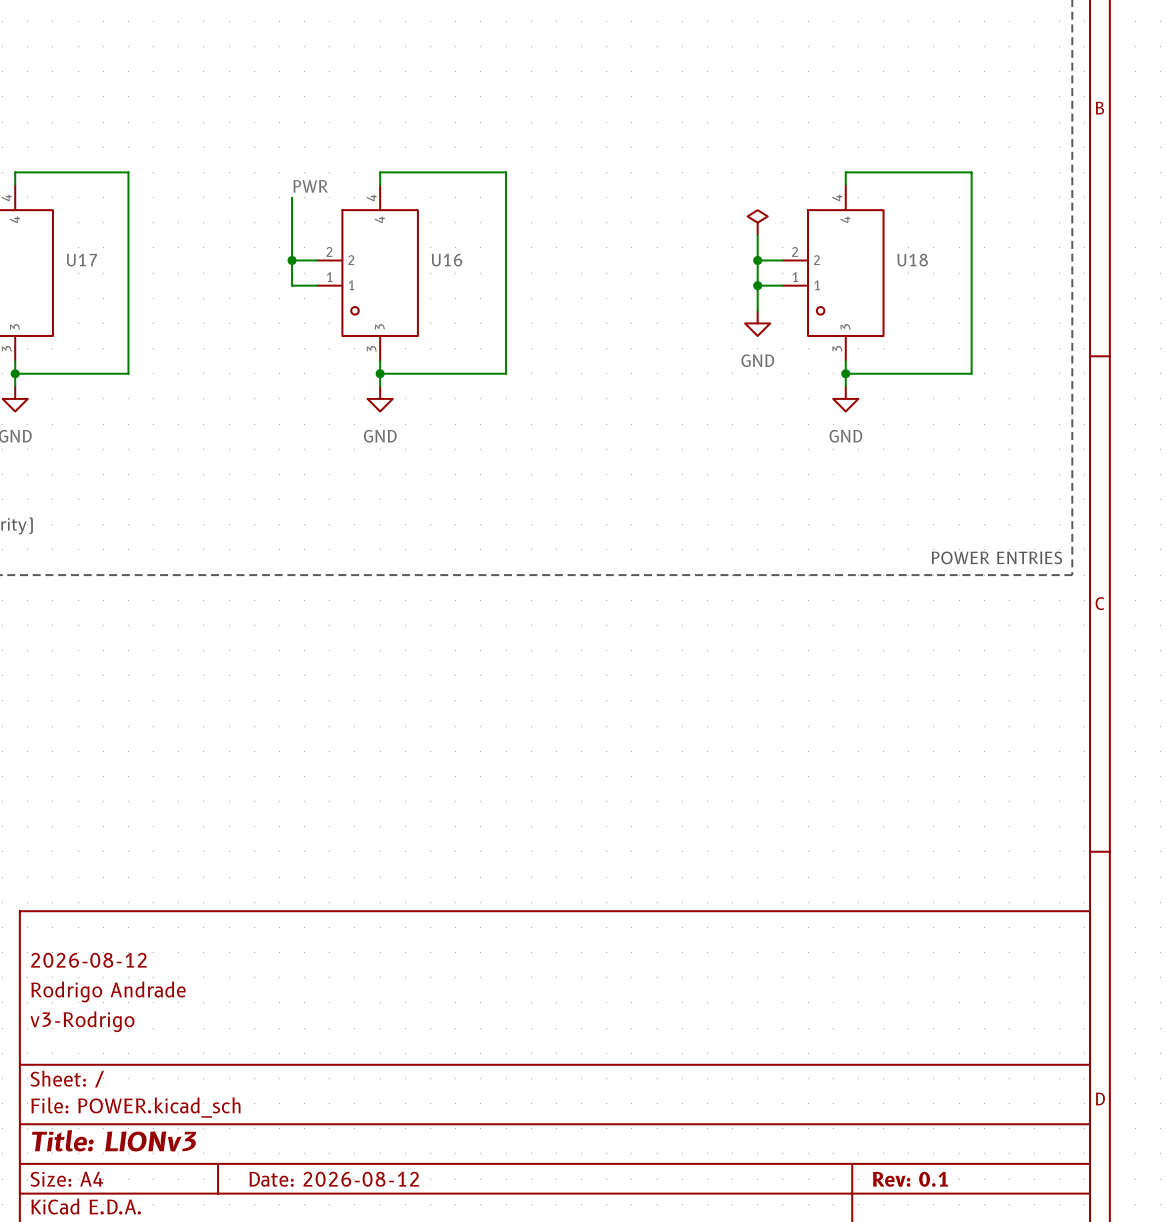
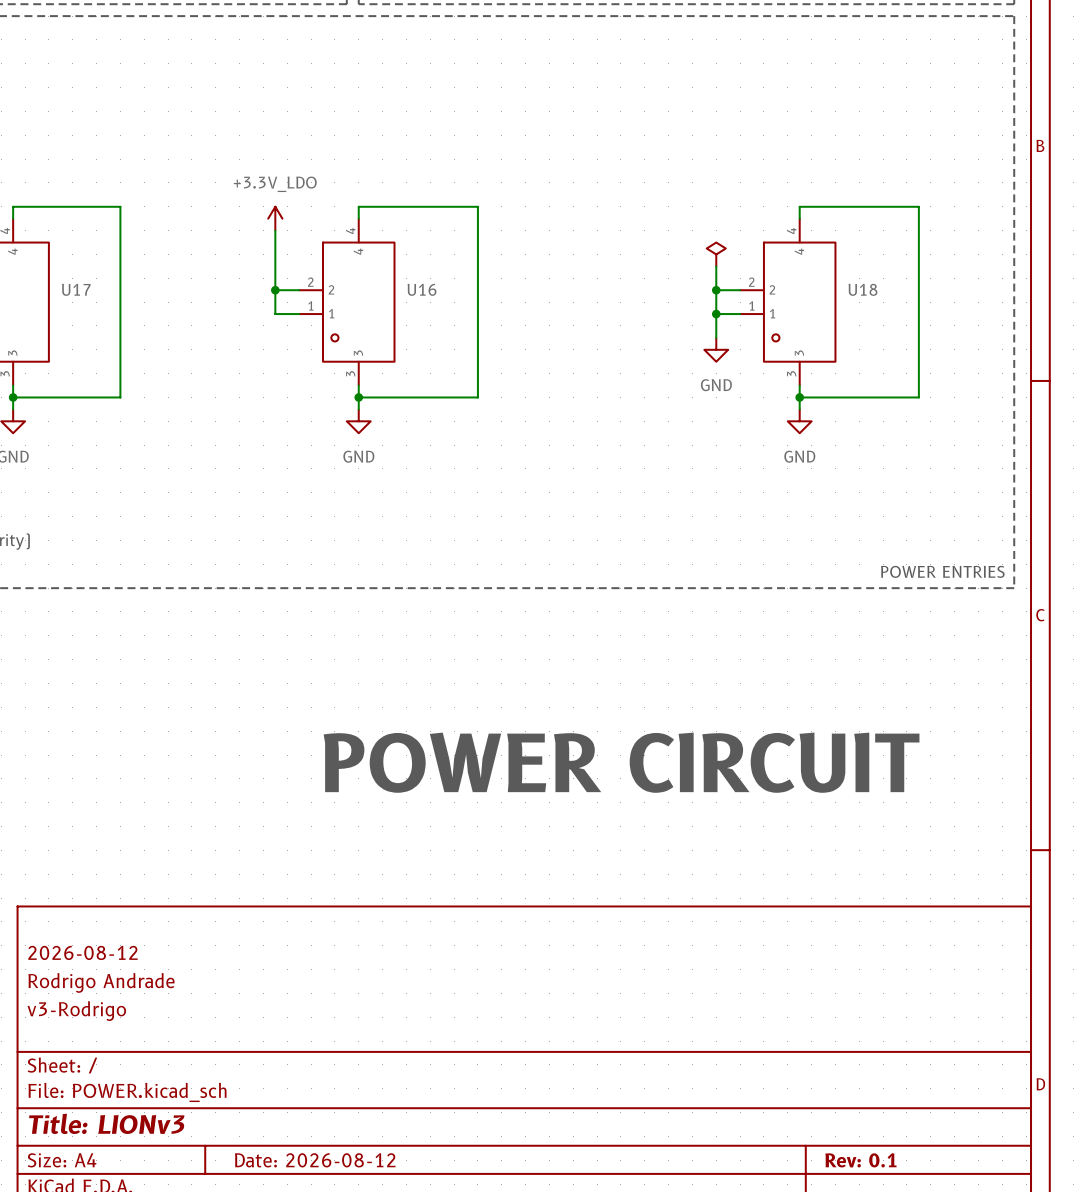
power symbol: none -> +3.3V_LDO (275, 218)
label: PWR (310, 186) -> none
text: none -> POWER CIRCUIT (621, 762)

